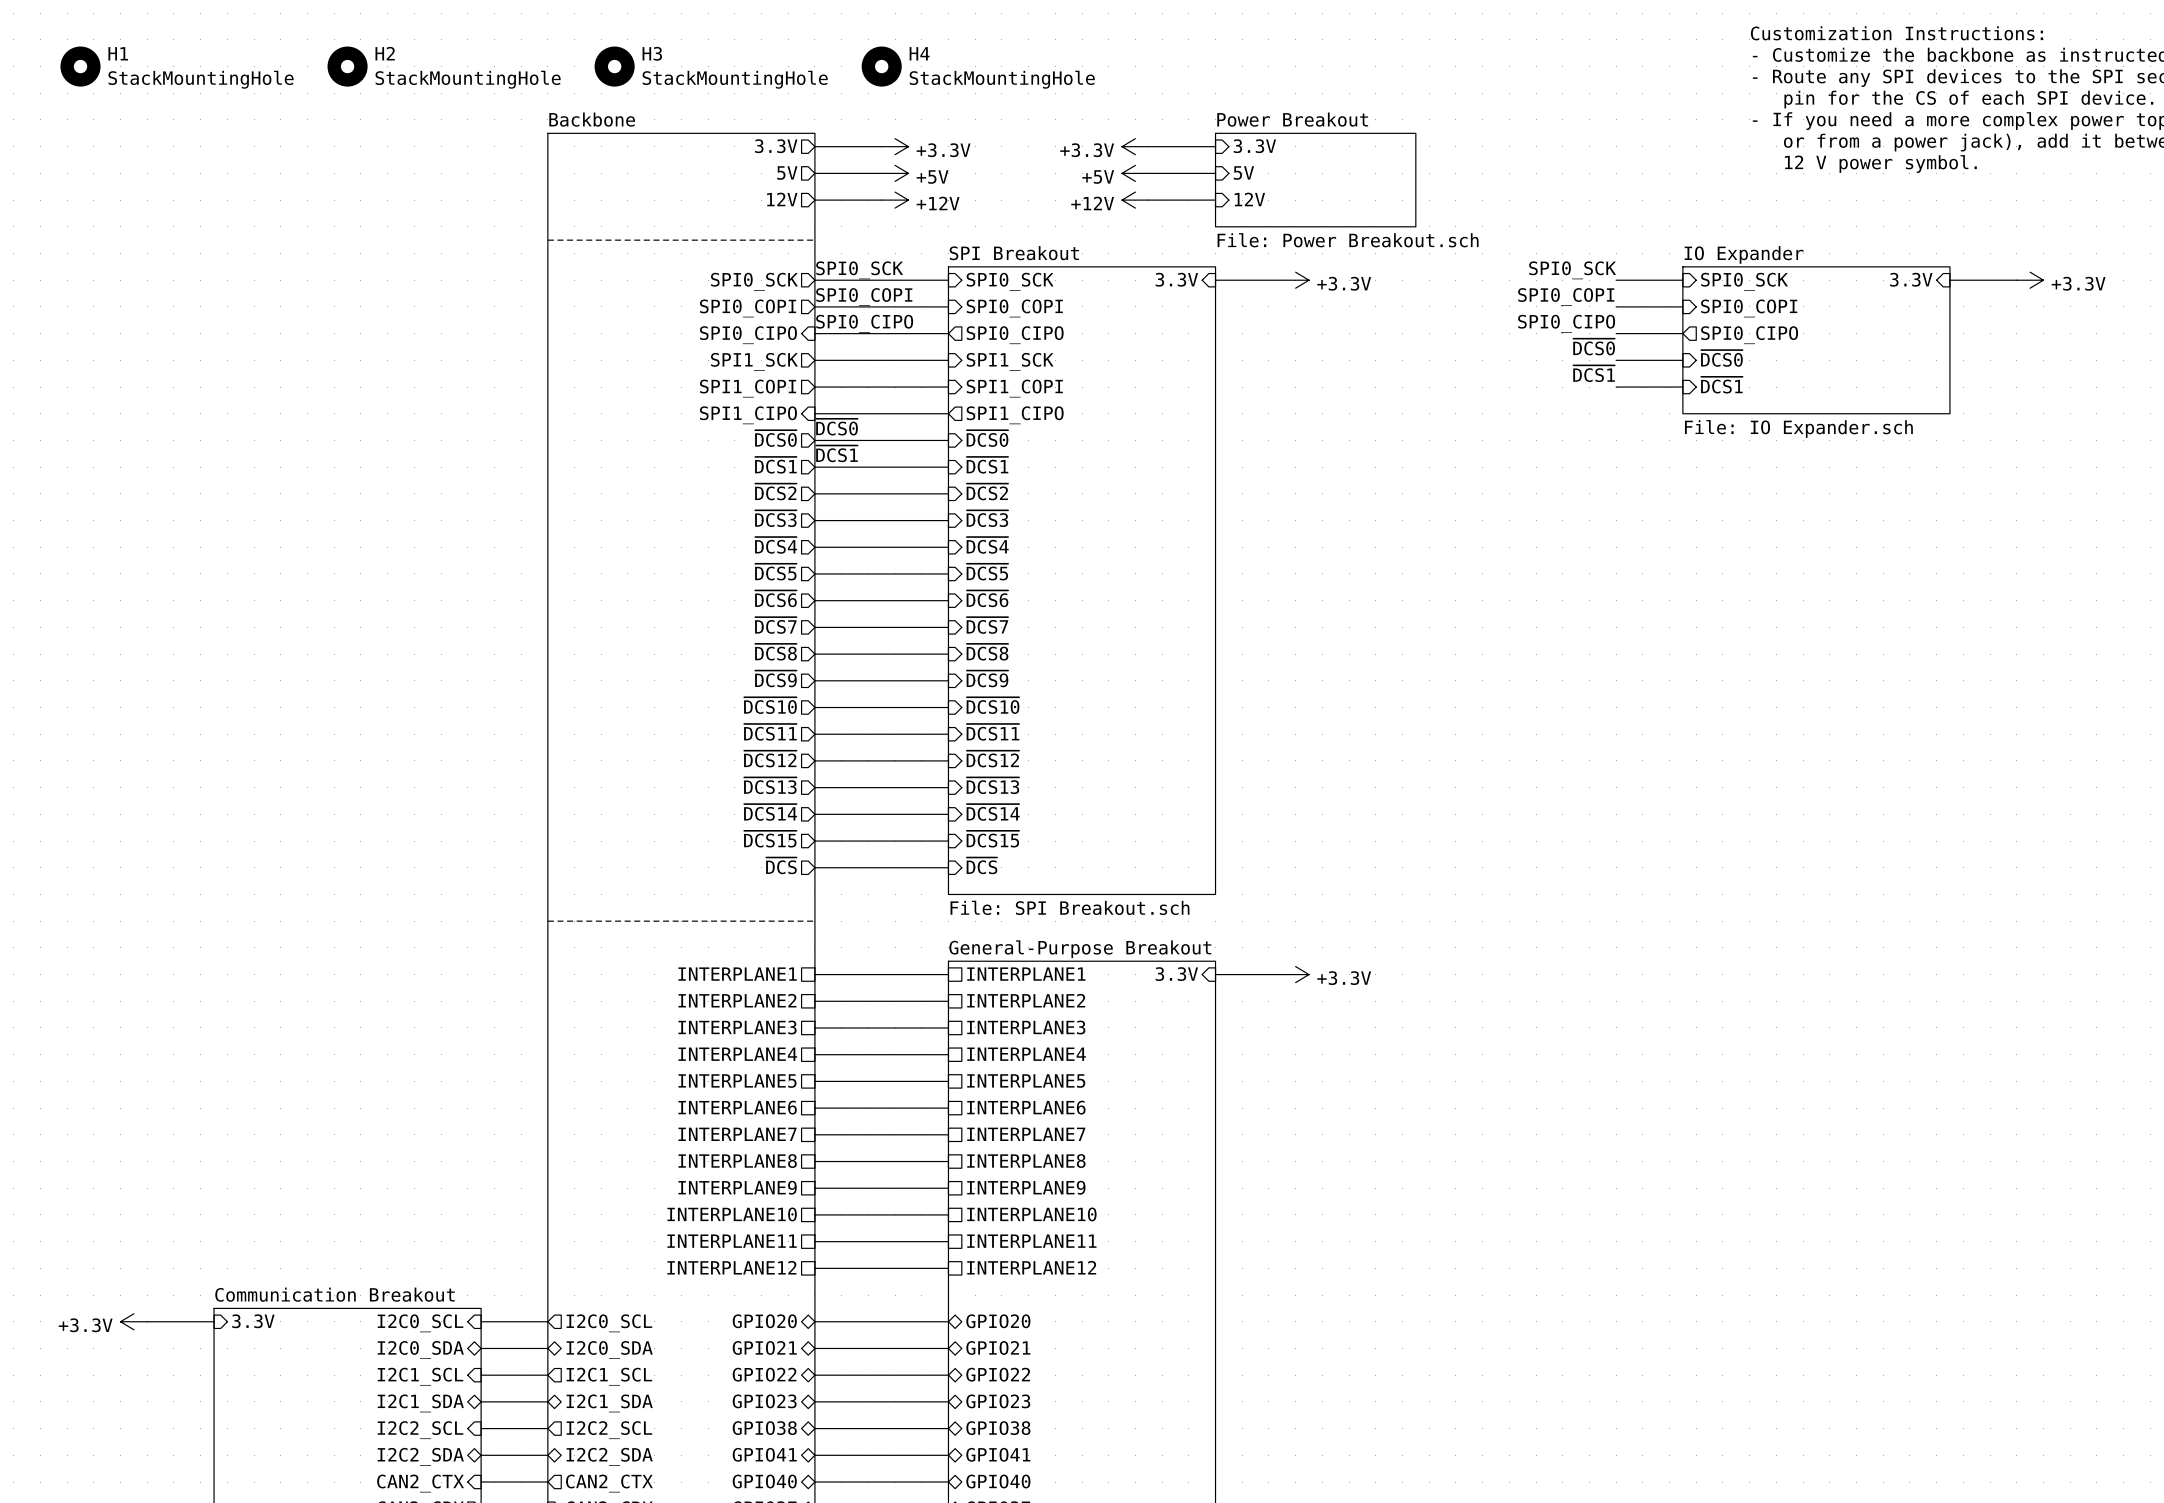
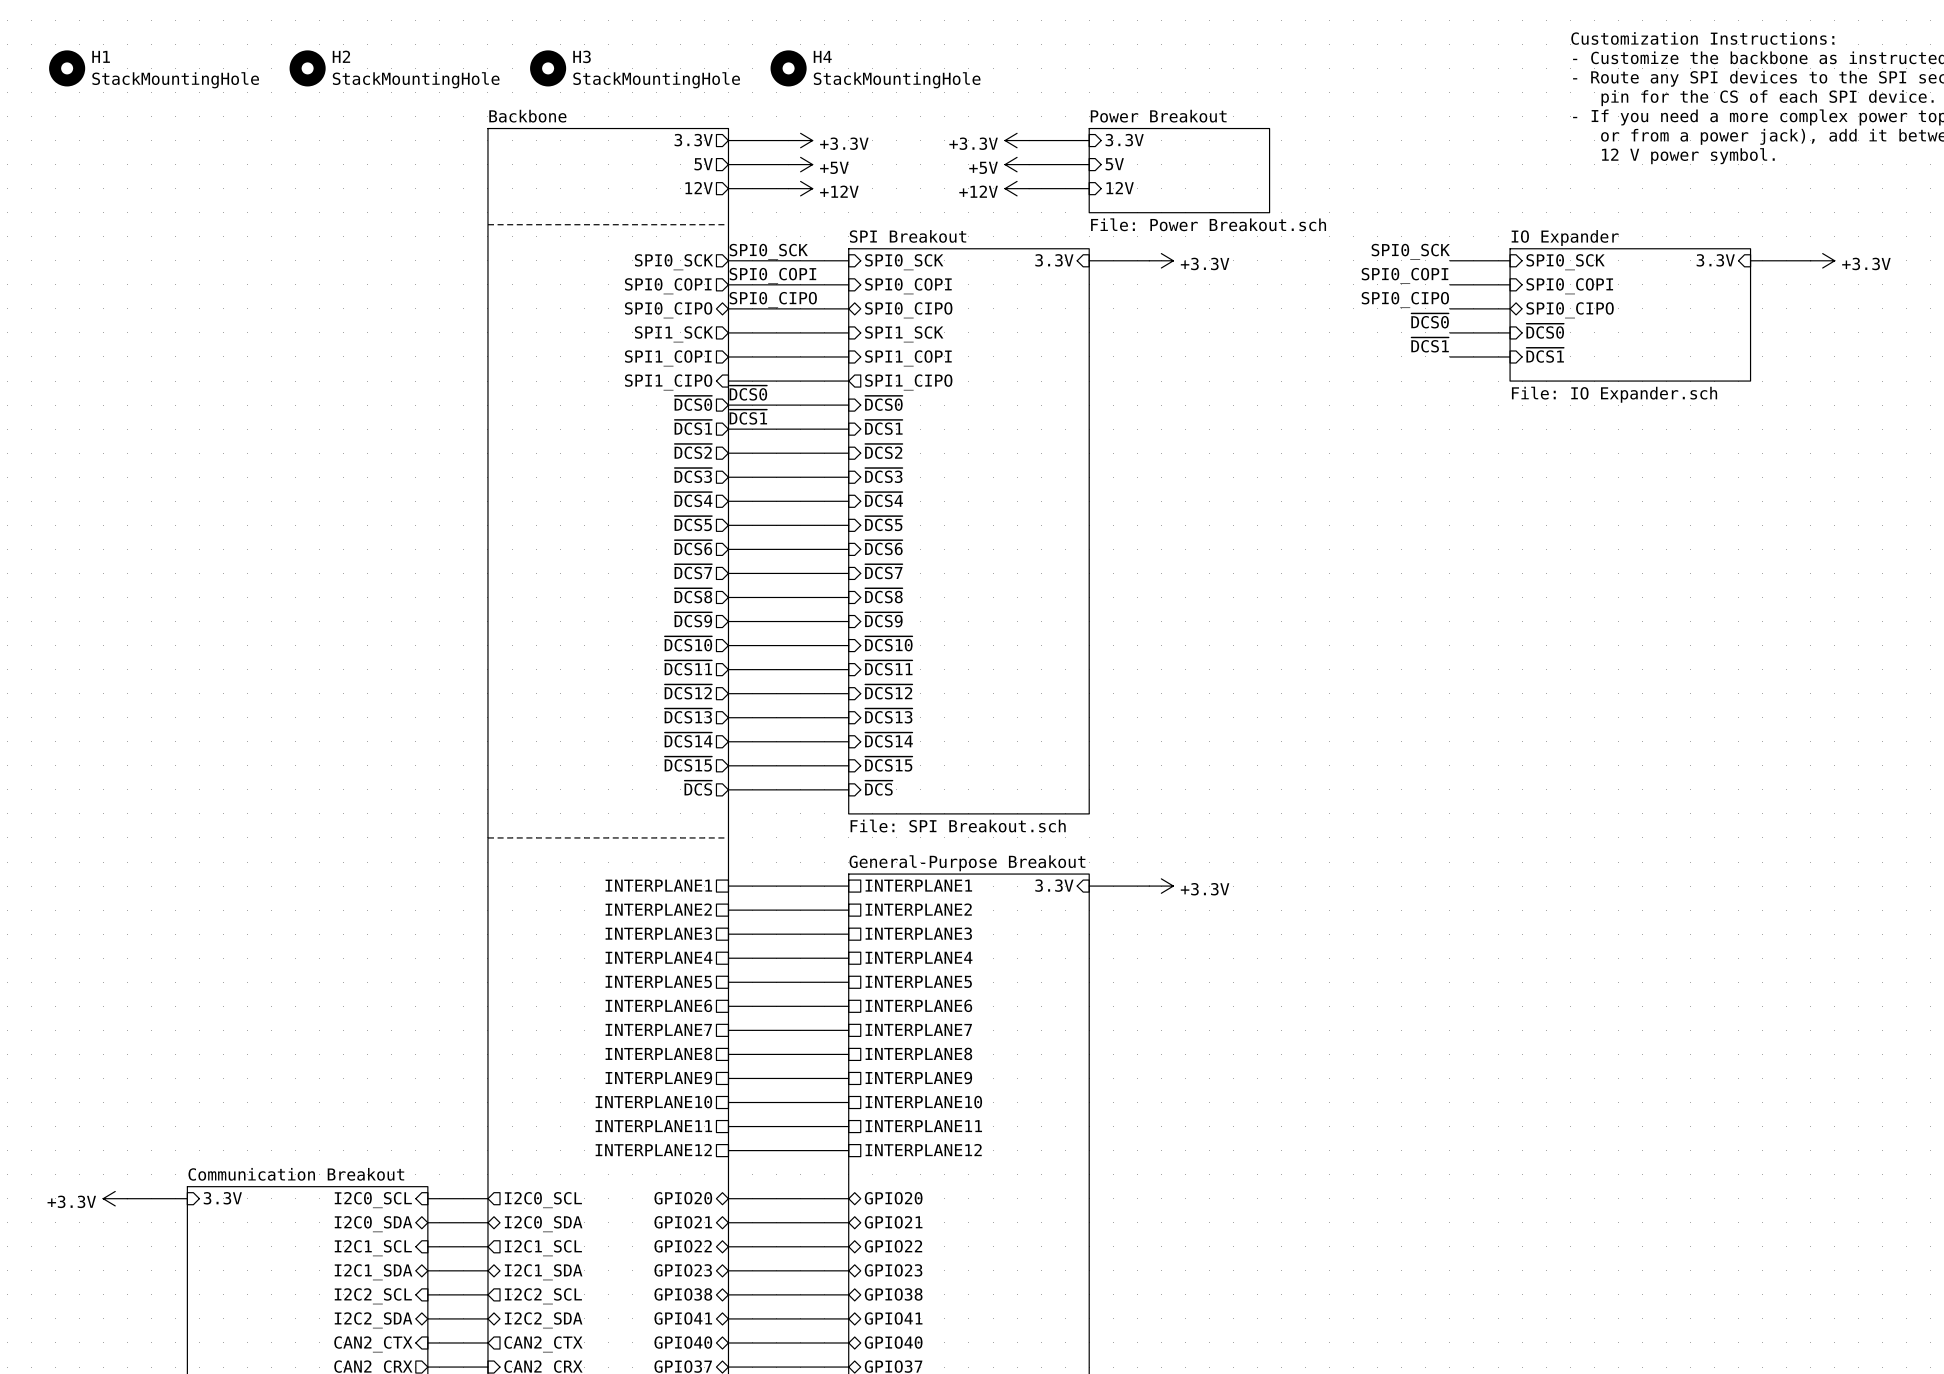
sheet pin shape: input (748, 335) -> bidirectional (668, 310)
sheet pin shape: output (1015, 335) -> bidirectional (908, 310)
sheet pin shape: output (1749, 335) -> bidirectional (1570, 310)

